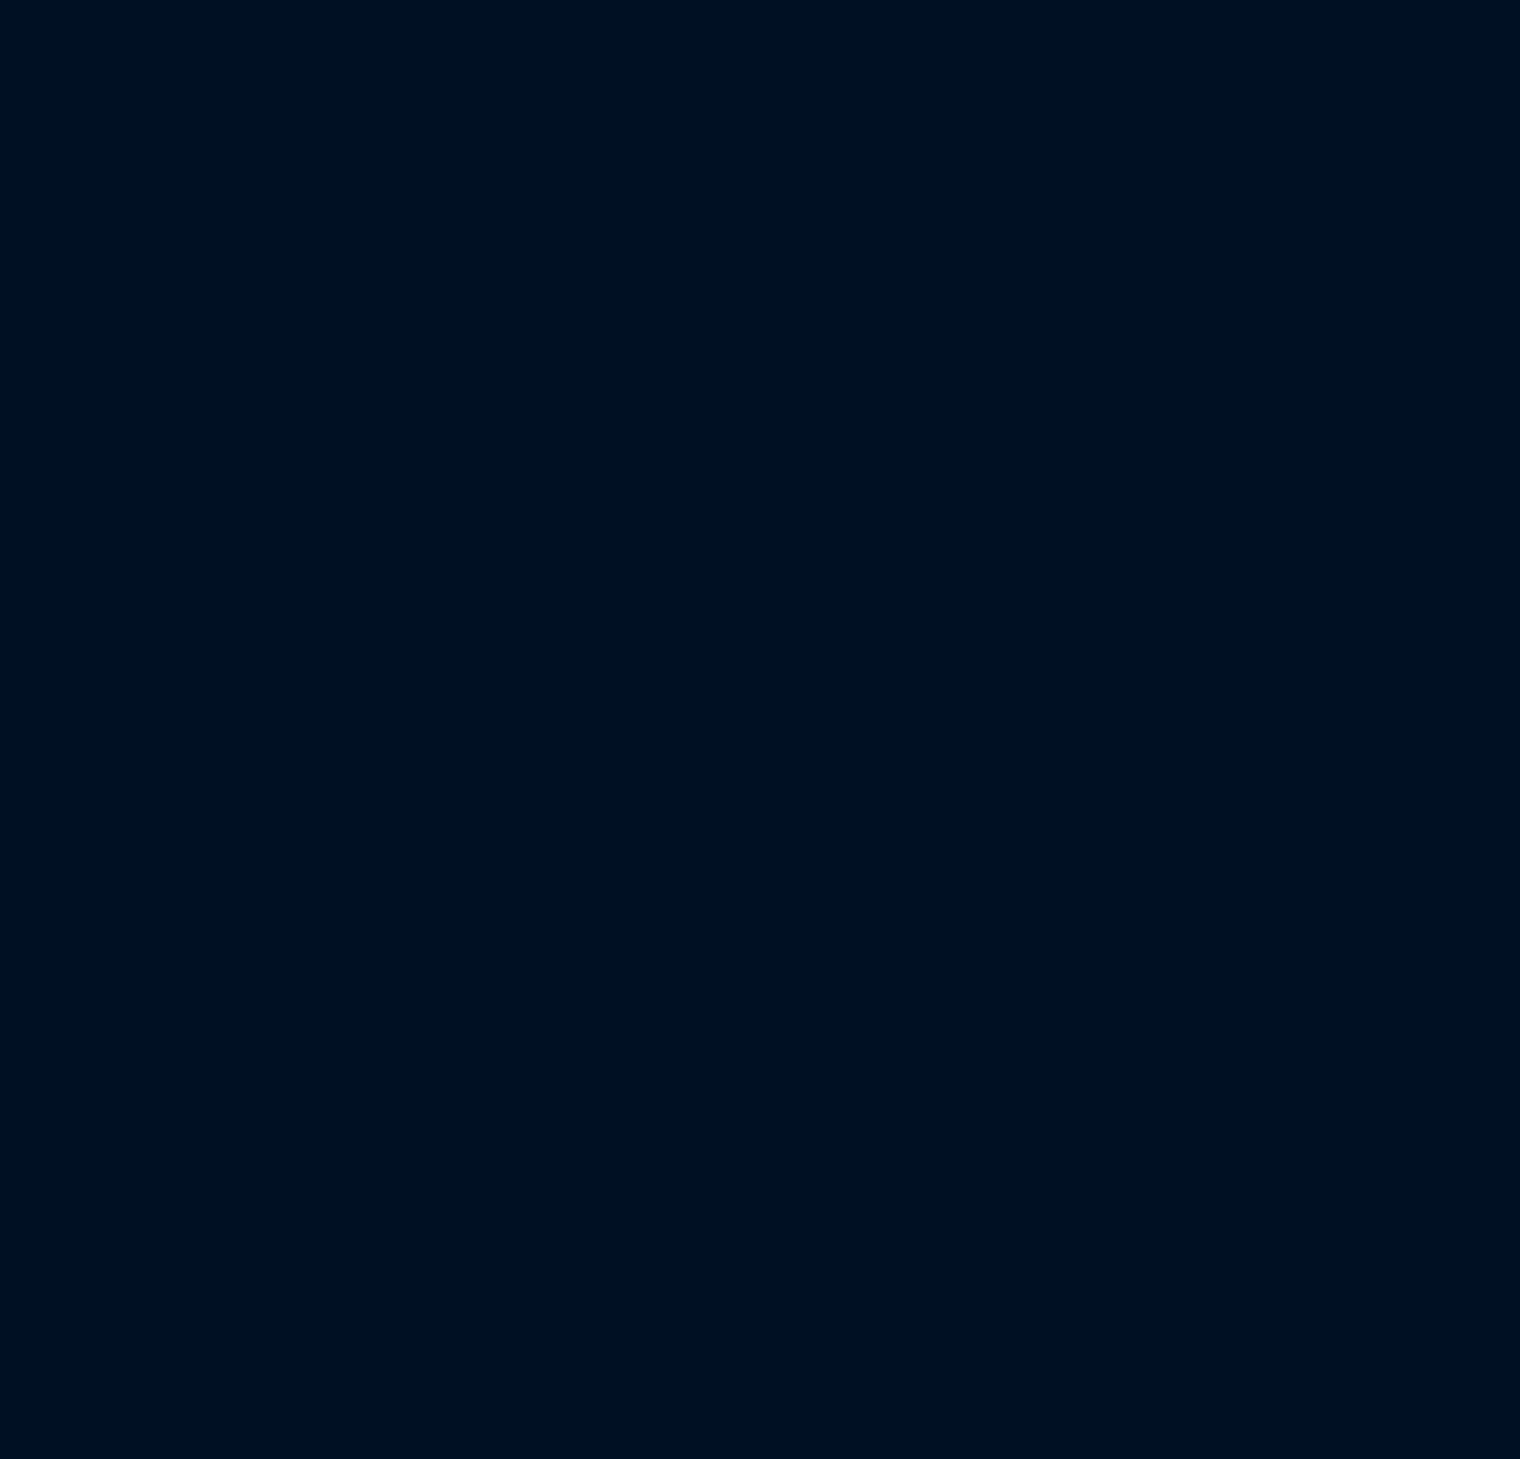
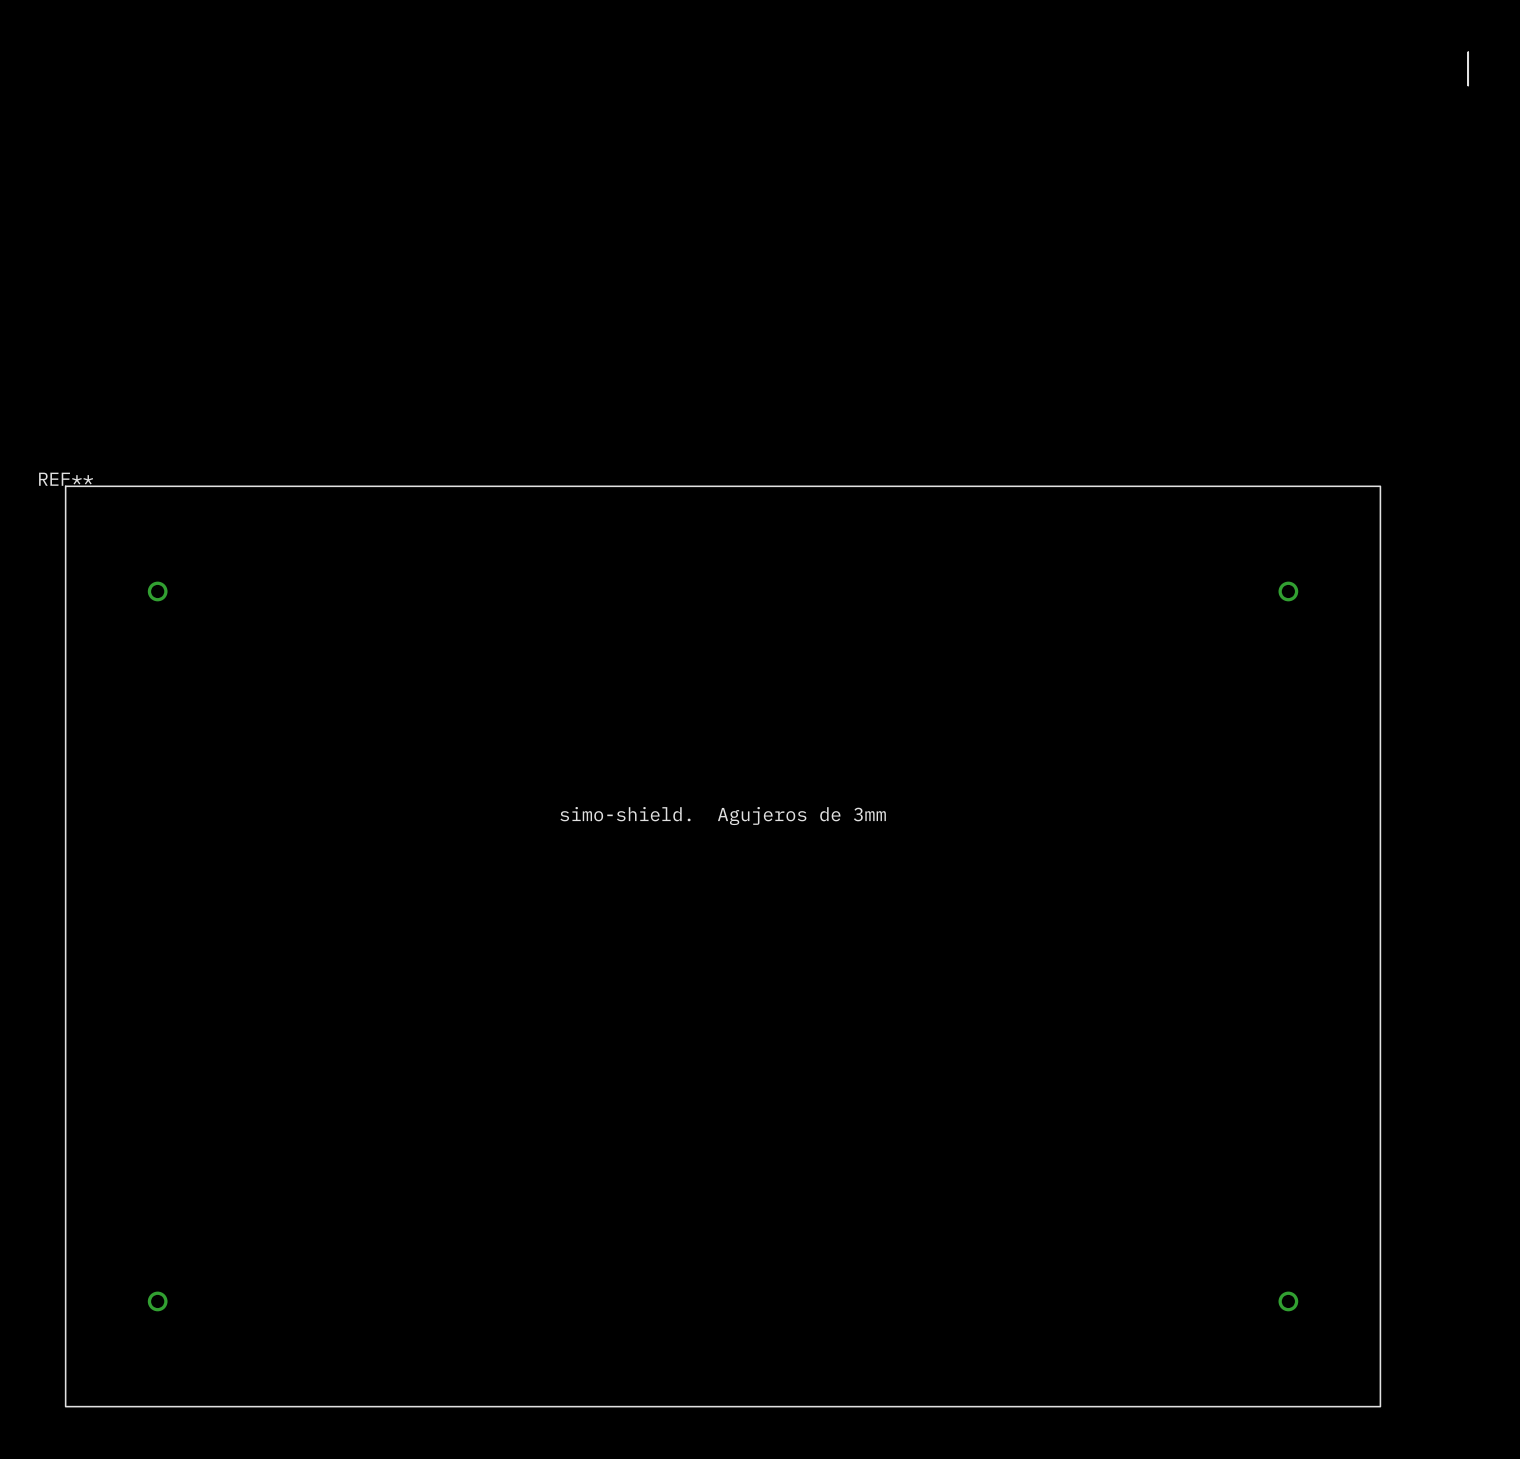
REF**: none -> (766, 729)

